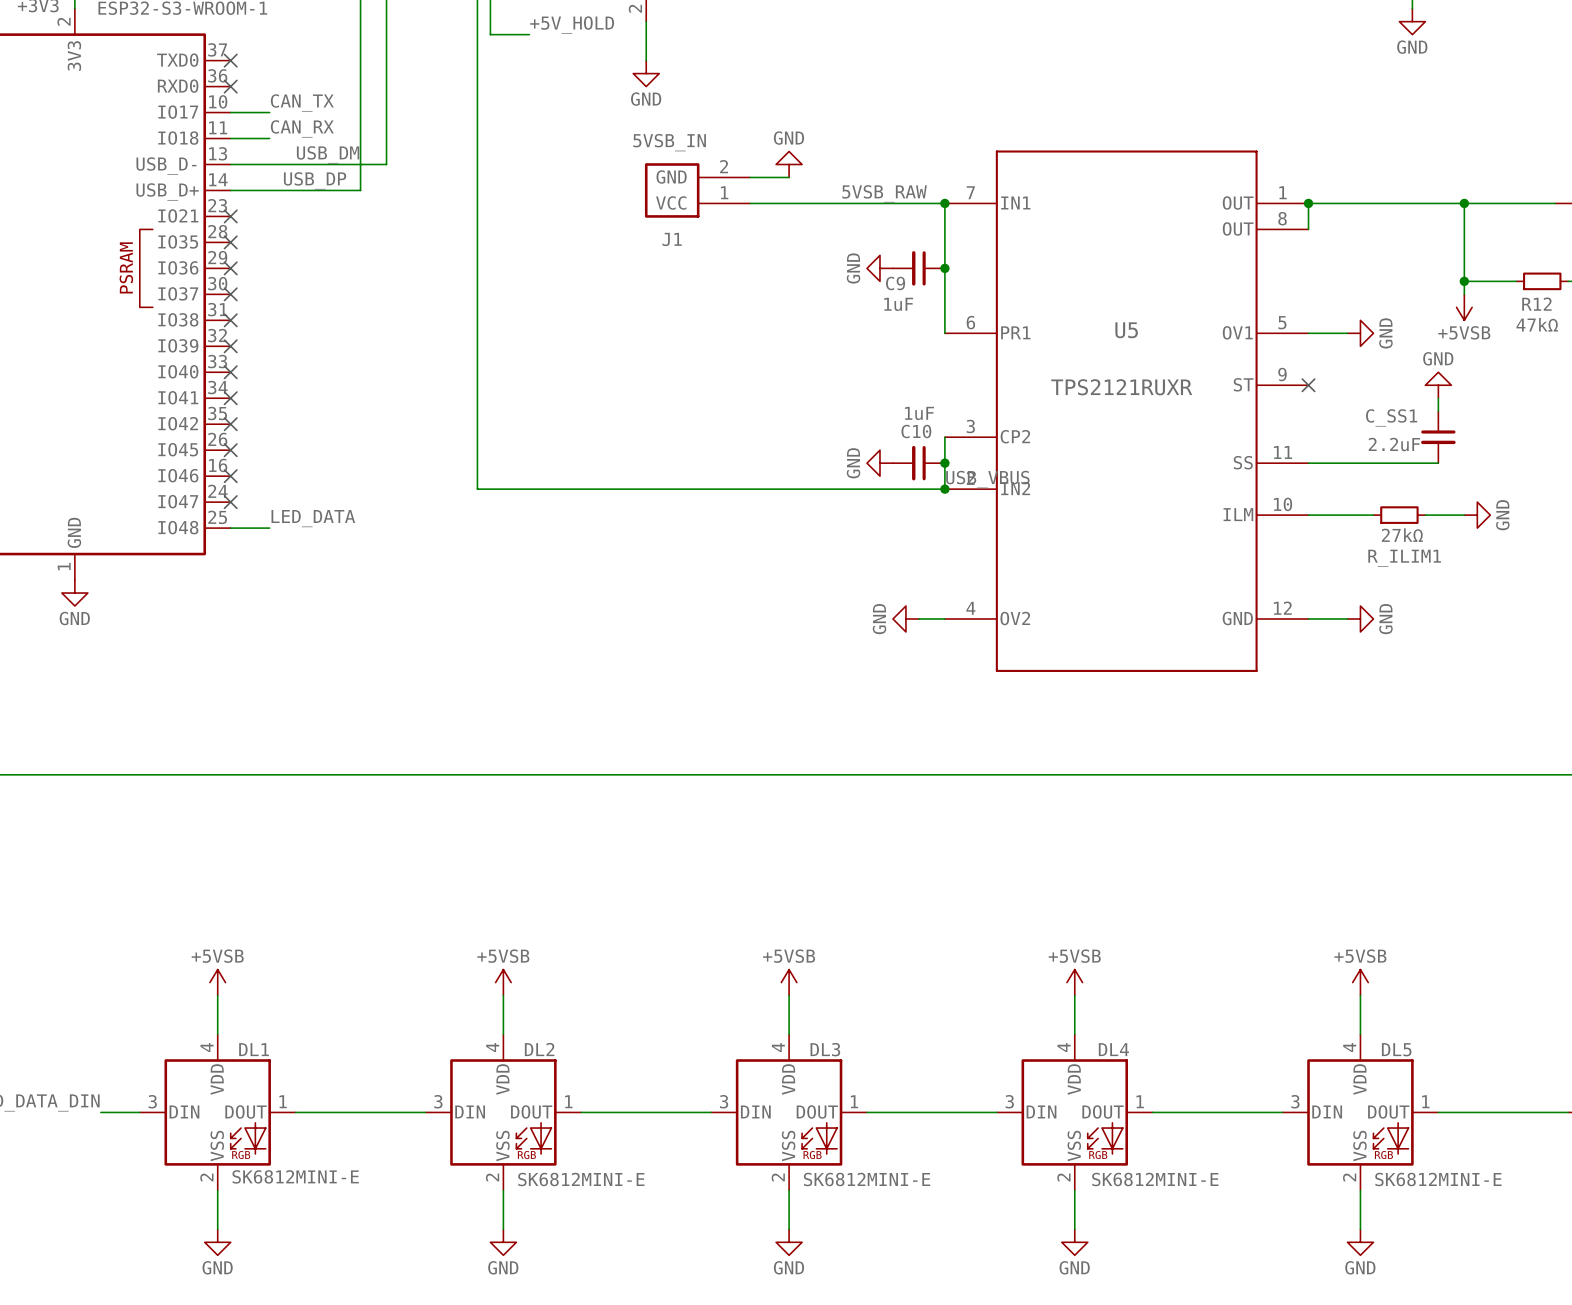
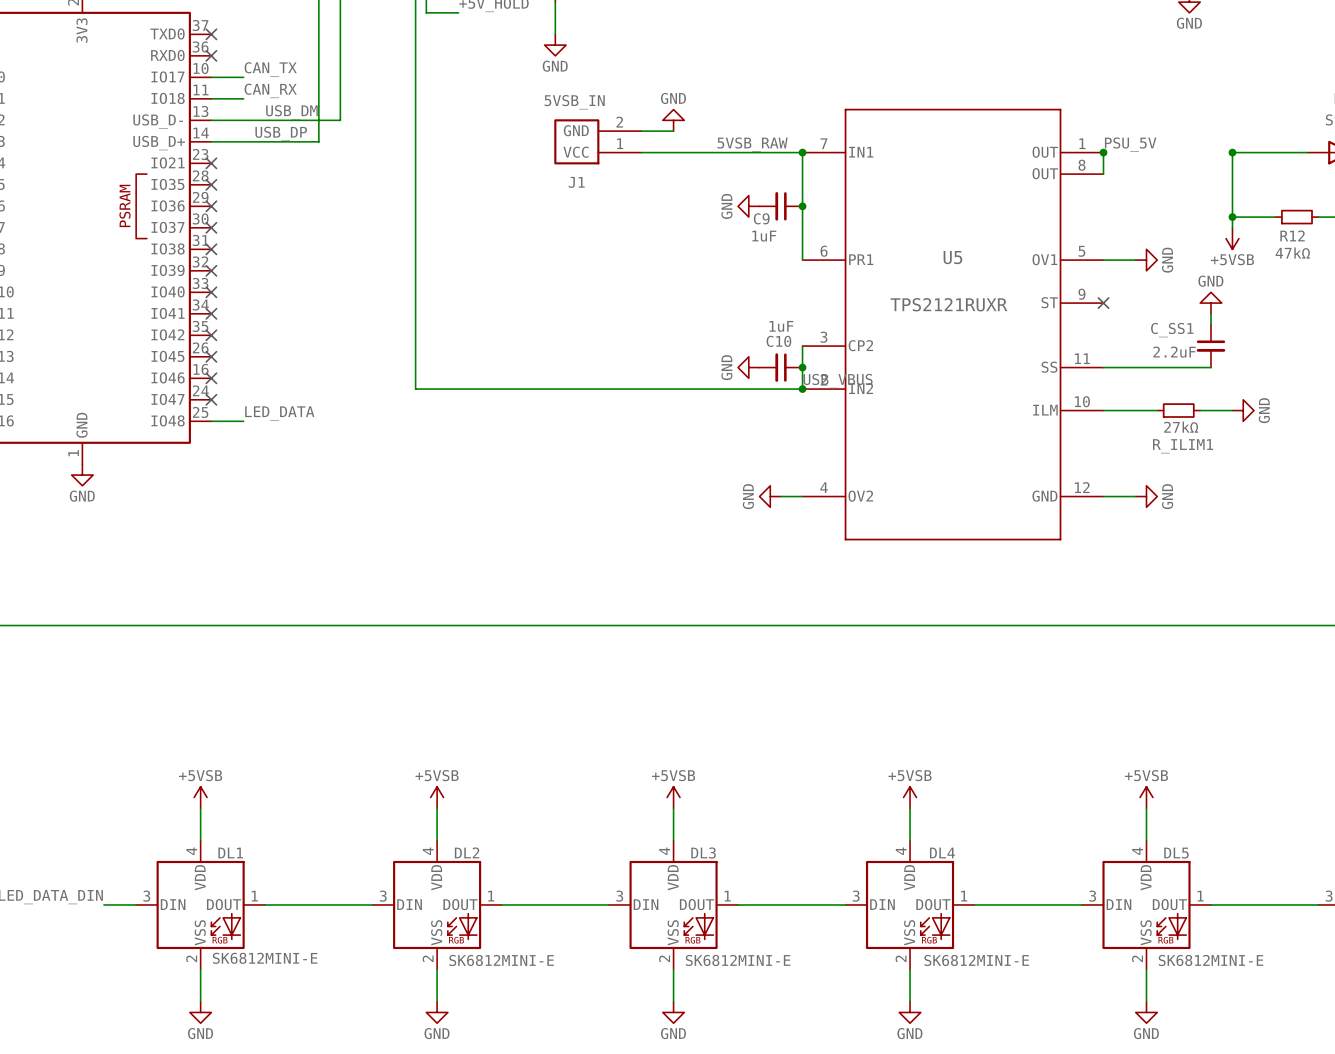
label: none -> PSU_5V (1130, 144)
wire: (1308, 203) (1464, 203) -> none

